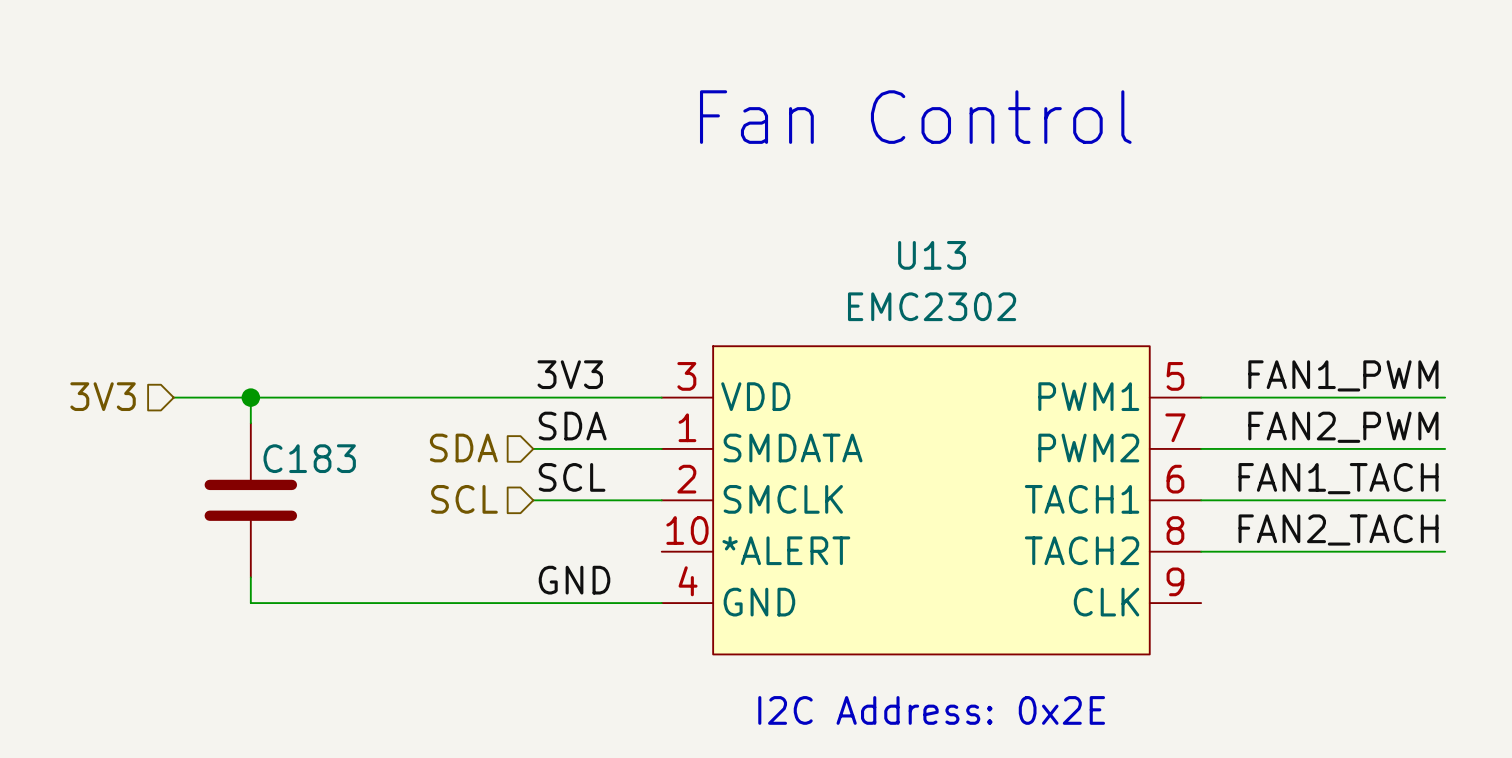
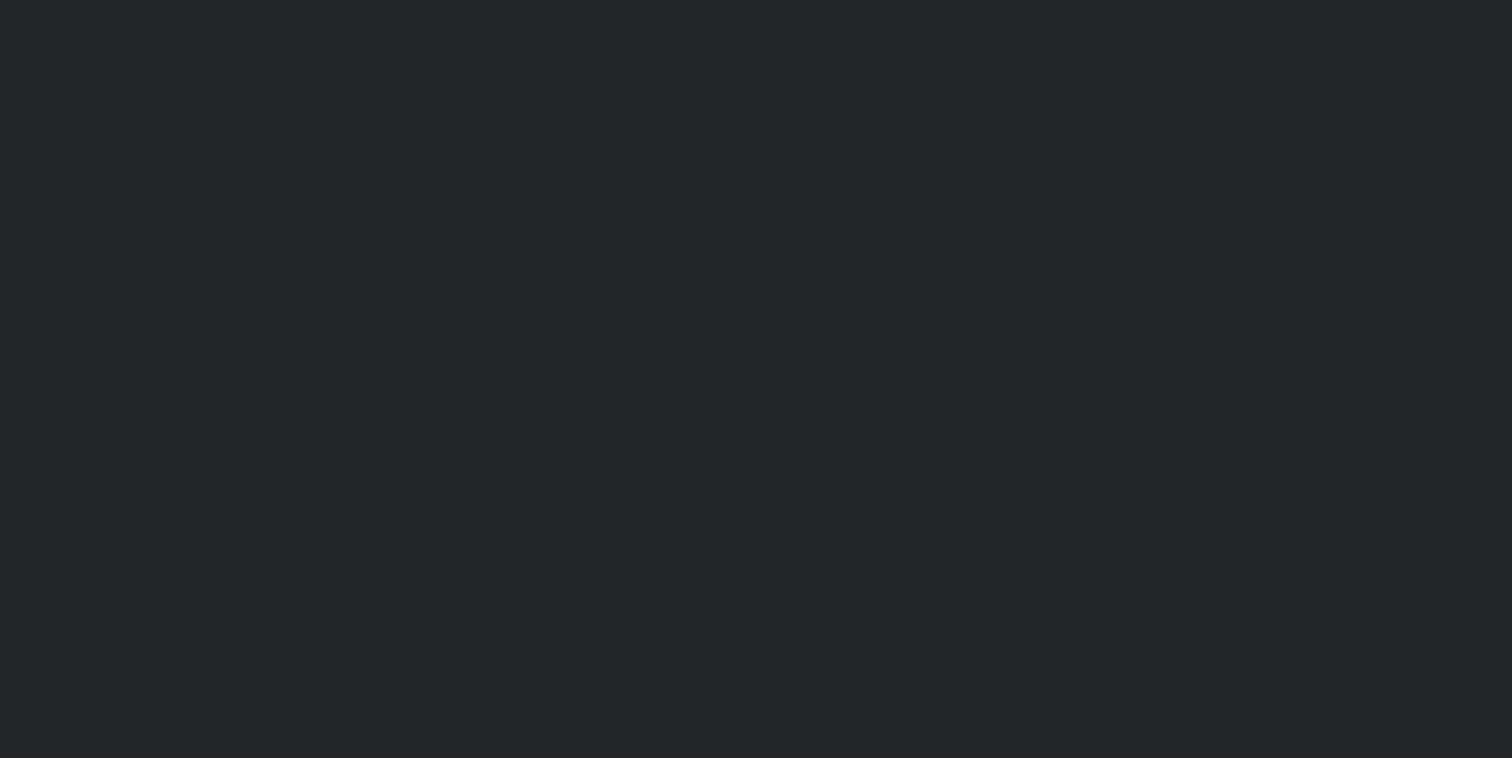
text: Fan Control (915, 117) -> none
label: 3V3 (570, 374) -> none
label: FAN1_PWM (1343, 375) -> none
hierarchical label: 3V3 (103, 396) -> none
wire: (173, 397) (661, 397) -> none
wire: (250, 397) (250, 423) -> none
junction: (250, 397) -> none
wire: (1201, 397) (1445, 397) -> none
label: SDA (572, 426) -> none
label: FAN2_PWM (1343, 427) -> none
hierarchical label: SDA (463, 448) -> none
wire: (533, 448) (661, 448) -> none
wire: (1201, 448) (1445, 448) -> none
label: SCL (572, 477) -> none
label: FAN1_TACH (1338, 478) -> none
hierarchical label: SCL (464, 499) -> none
C183: (250, 500) -> none
wire: (533, 500) (661, 500) -> none
U13: EMC2302 (931, 500) -> none
wire: (1201, 500) (1445, 500) -> none
label: FAN2_TACH (1338, 530) -> none
wire: (1201, 551) (1445, 551) -> none
wire: (250, 577) (250, 603) (661, 603) -> none
label: GND (574, 580) -> none
text: I2C Address: 0x2E (931, 710) -> none

